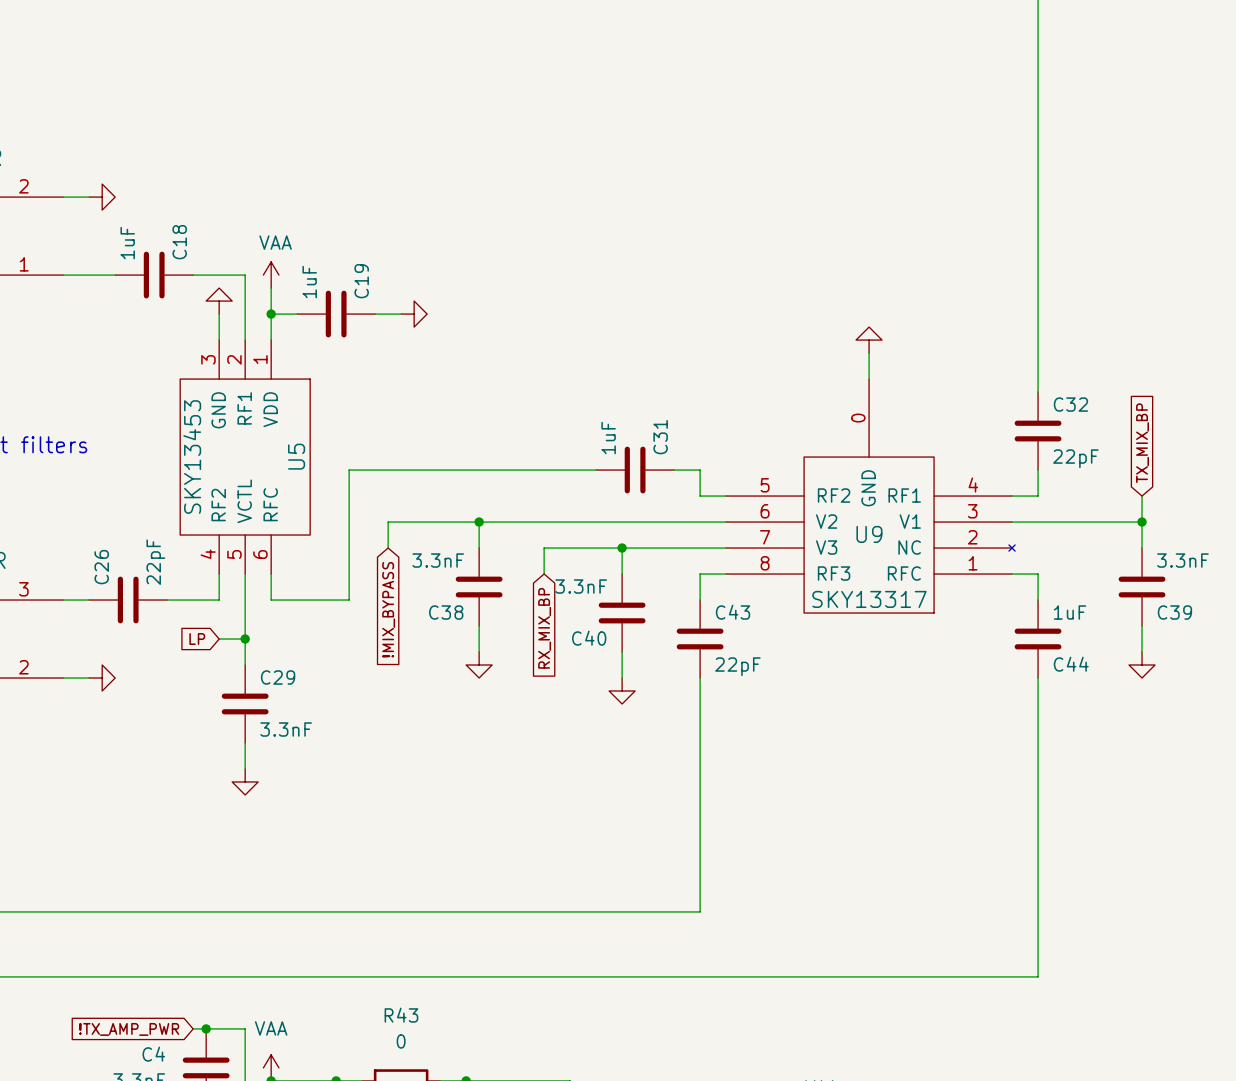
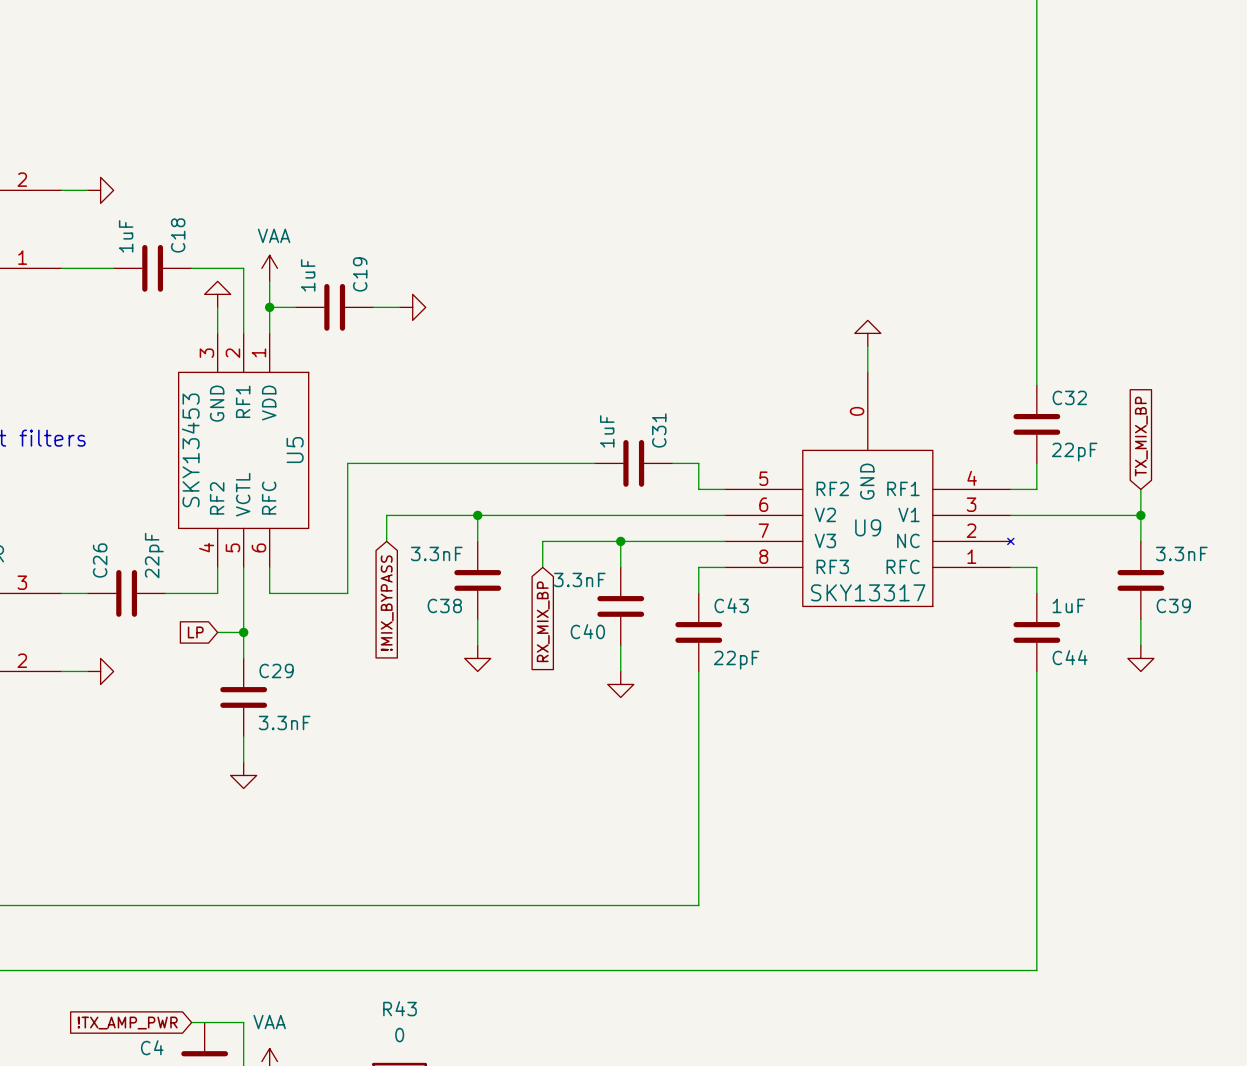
junction: (206, 1028) -> none

